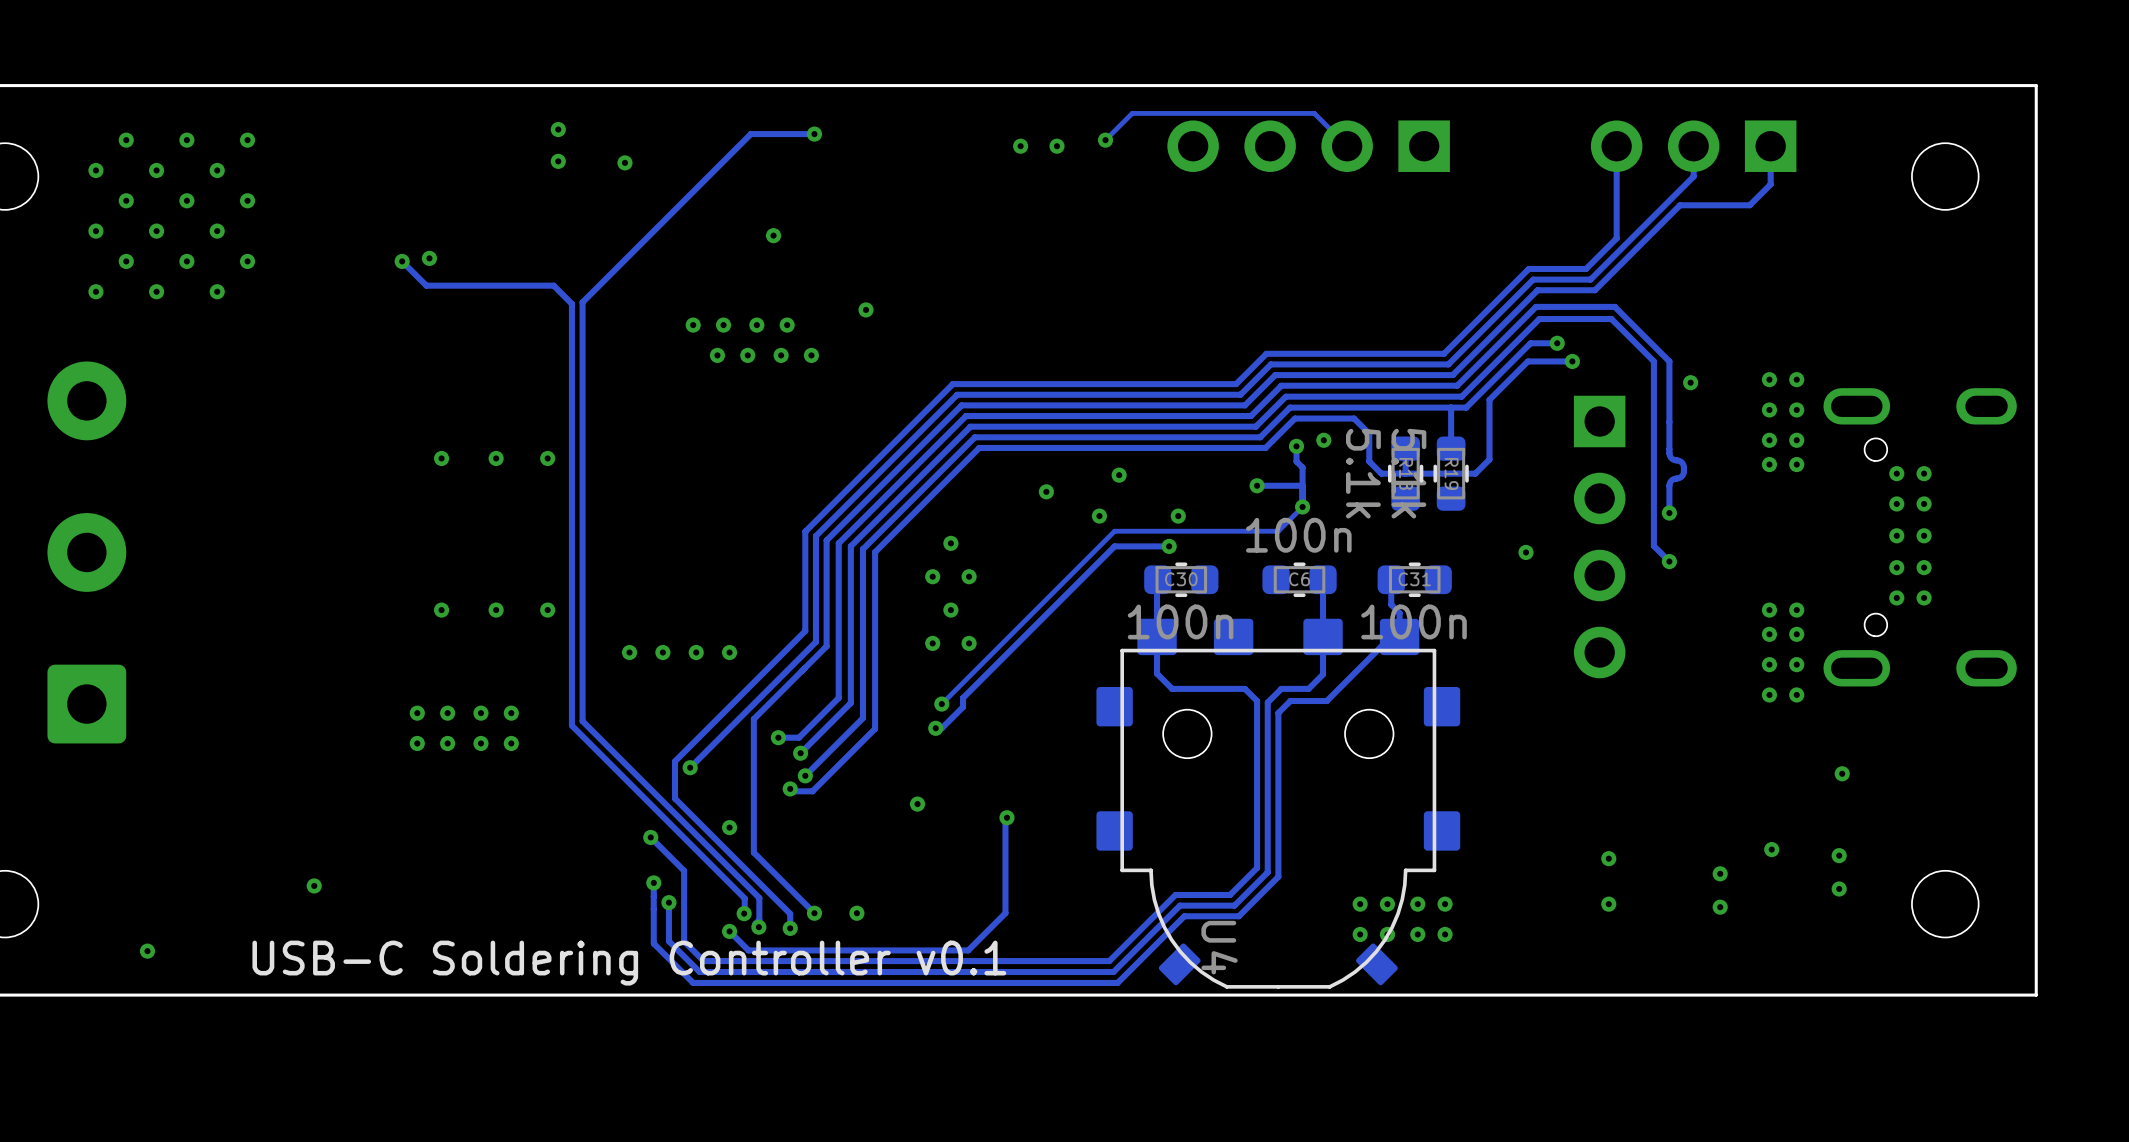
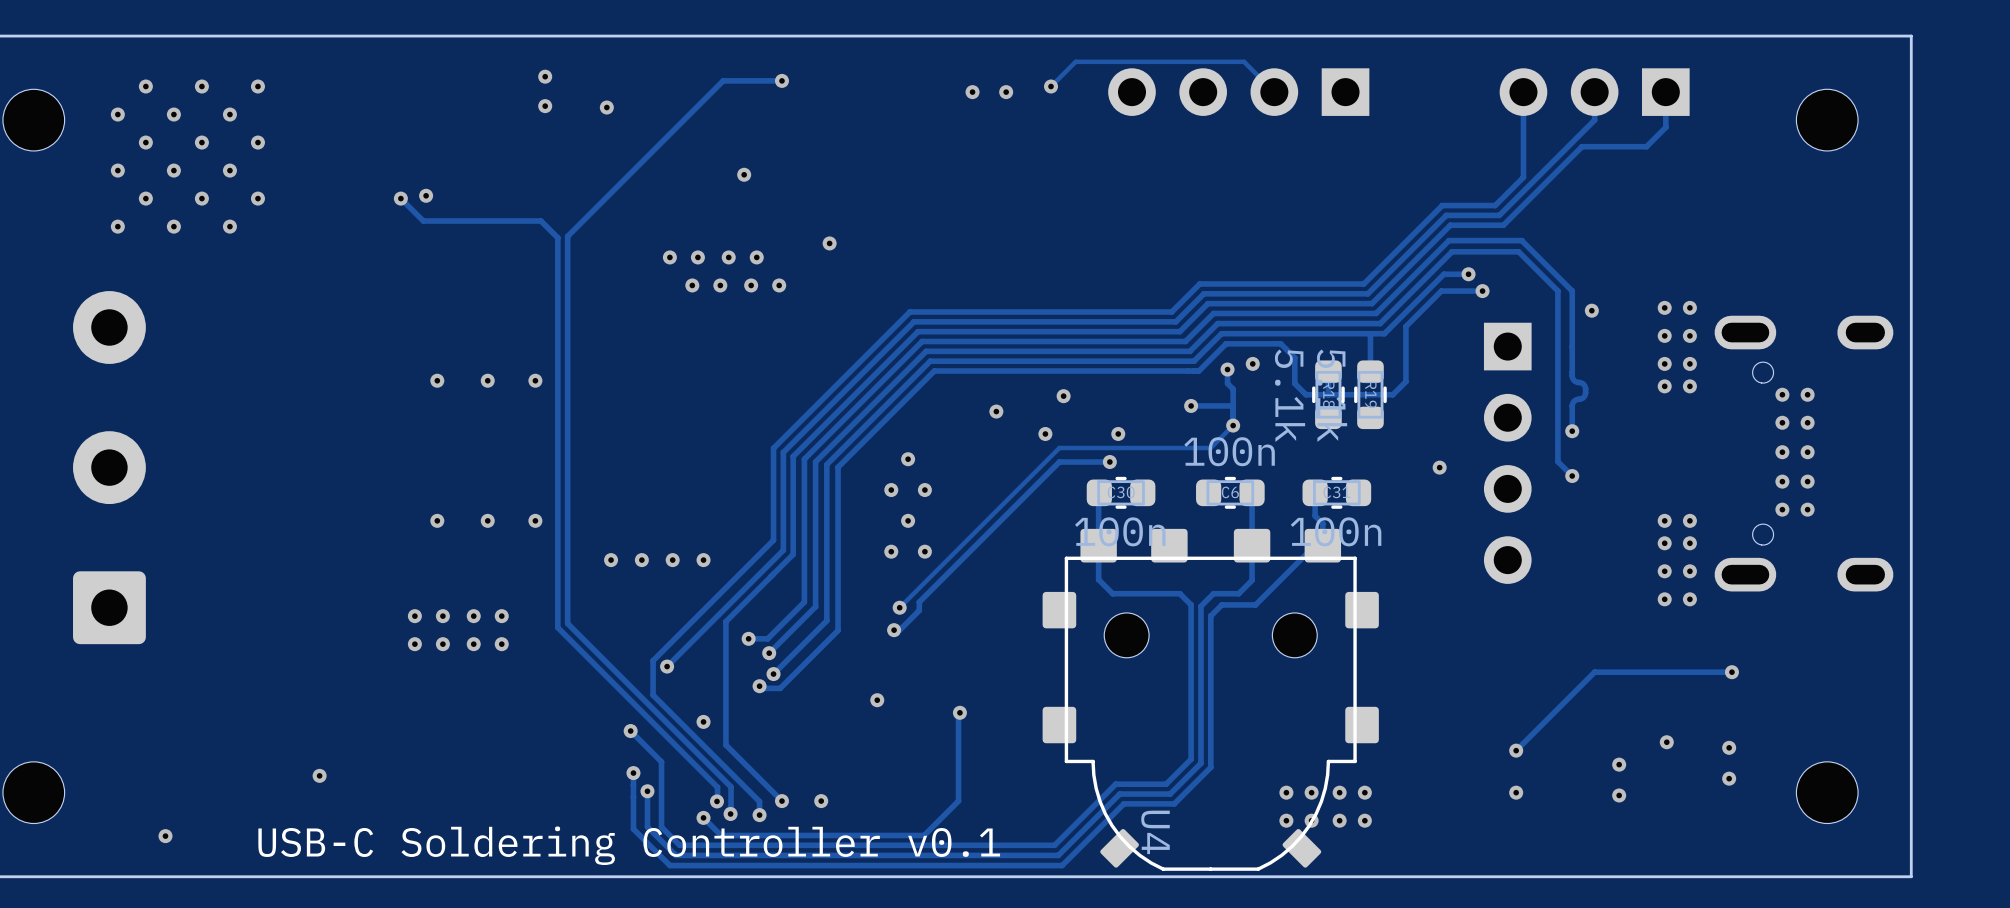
track: none -> (1731, 672) (1594, 672) (1516, 750)

